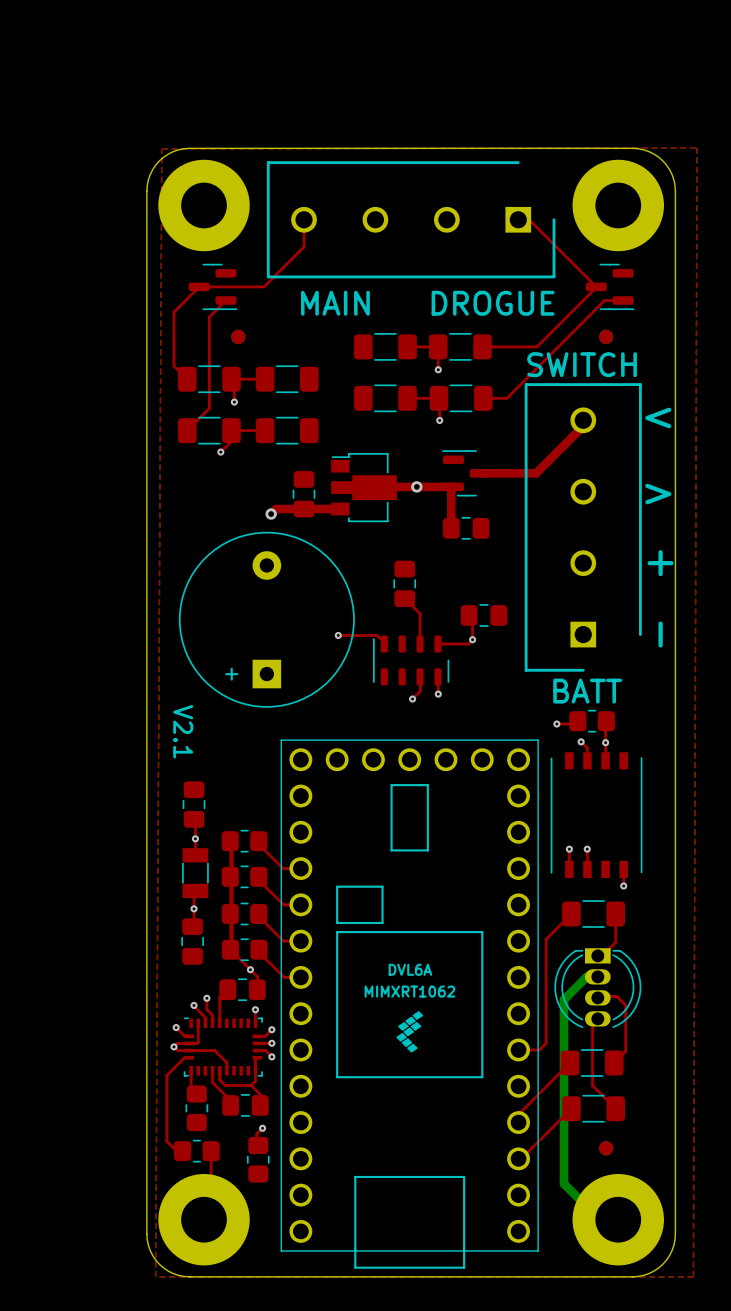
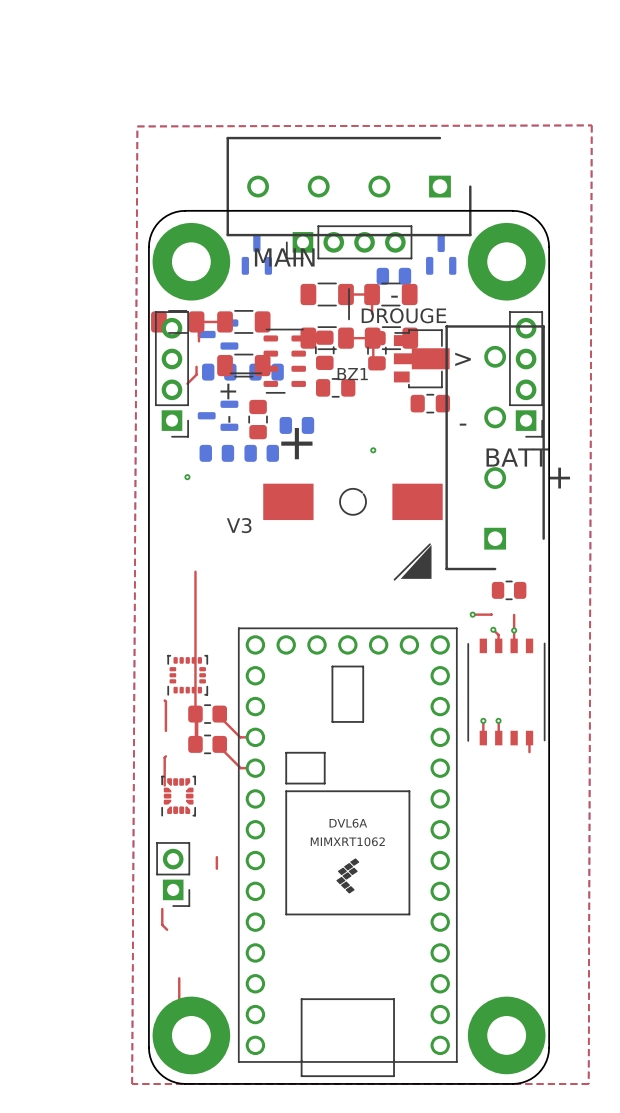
part position: (204, 205) -> (191, 261)
part position: (618, 205) -> (506, 261)
top track: (304, 219) (304, 246) (264, 286) (199, 286) (174, 312) (174, 366) (187, 379) -> none
top track: (518, 219) (529, 219) (596, 287) (536, 346) (482, 346) -> none
part: none -> (349, 242)
part side: top (213, 286) -> bottom (441, 254)
part side: top (610, 286) -> bottom (256, 254)
top track: (225, 300) (209, 317) (209, 408) (187, 430) -> none
top track: (623, 300) (604, 300) (506, 398) (483, 398) -> none
text: DROGUE (493, 303) -> none
part: none -> (393, 276)
part: (238, 336) -> none
part: (606, 336) -> none
line: none -> (349, 289) (349, 319)
text: none -> - (394, 296)
text: SWITCH (582, 364) -> none
via: (438, 369) -> none
text: none -> DROUGE (403, 315)
part: none -> (218, 334)
via: (234, 402) -> none
part: none -> (324, 350)
part: none -> (376, 350)
part footprint: [177, 416, 241, 445] -> [155, 311, 189, 438]
text: > (658, 417) -> none
via: (439, 420) -> none
top track: (582, 420) (582, 426) (536, 473) (480, 473) -> none
text: none -> > (463, 359)
top track: (231, 430) (265, 430) -> none
part: none -> (219, 372)
part: none -> (266, 372)
line: none -> (230, 373) (261, 373)
part: none -> (526, 374)
via: (220, 452) -> none
part: none -> (335, 387)
text: none -> + (228, 391)
part: (466, 473) -> none
part: none -> (430, 403)
via: (416, 486) -> none
top track: (341, 487) (453, 486) (451, 489) (451, 528) -> none
part position: (364, 487) -> (421, 358)
part: none -> (218, 415)
text: none -> - (229, 419)
text: > (658, 494) -> none
text: none -> - (463, 424)
part: none -> (296, 425)
top track: (340, 509) (276, 509) (271, 514) -> none
via: (271, 514) -> none
part: (466, 528) -> none
via: none -> (373, 450)
part: none -> (216, 453)
part: none -> (261, 453)
via: none -> (187, 477)
part: (404, 583) -> none
top track: (404, 598) (420, 613) (420, 644) -> none
top track: (469, 615) (472, 618) (472, 639) (468, 644) (437, 644) -> none
part: (483, 615) -> none
part: (266, 619) -> none
text: none -> V3 (239, 525)
BZ1: none -> (352, 532)
text: - (660, 634) -> none
top track: (338, 635) (377, 635) (384, 642) -> none
via: (338, 635) -> none
via: (472, 639) -> none
part rotation: 0° (411, 660) -> 90° clockwise (284, 361)
part position: (411, 660) -> (284, 361)
top track: none -> (195, 571) (195, 714)
top track: (420, 681) (420, 691) (412, 699) -> none
top track: (438, 681) (438, 694) -> none
text position: BATT (587, 691) -> BATT (517, 457)
via: (438, 694) -> none
part: none -> (509, 590)
via: (412, 699) -> none
part: (592, 721) -> none
text: V2.1 (183, 731) -> none
part: none -> (187, 675)
part: (194, 804) -> none
via: (195, 838) -> none
part: (195, 873) -> none
top track: (231, 878) (231, 950) -> none
via: (623, 886) -> none
via: (194, 908) -> none
part: (244, 914) -> none
top track: (571, 914) (546, 939) (546, 1043) (539, 1049) (518, 1049) -> none
part: (593, 914) -> none
top track: (615, 914) (615, 942) (597, 960) -> none
top track: (257, 915) (283, 941) (300, 941) -> none
part: none -> (178, 796)
part: (192, 941) -> none
part: (244, 949) -> none
top track: (231, 950) (257, 976) (257, 989) -> none
top track: (257, 950) (284, 977) (300, 977) -> none
via: (250, 969) -> none
bottom track: (597, 976) (586, 976) (563, 999) (563, 1183) (602, 1222) -> none
part: (597, 988) -> none
top track: (230, 989) (227, 989) (219, 997) (219, 1023) -> none
part: (242, 989) -> none
top track: (597, 996) (616, 996) (625, 1005) (625, 1051) (614, 1063) -> none
top track: (206, 998) (206, 1009) (212, 1015) (212, 1023) -> none
via: (206, 998) -> none
top track: (194, 1005) (205, 1017) (205, 1023) -> none
via: (194, 1005) -> none
via: (255, 1009) -> none
top track: (597, 1018) (592, 1024) (592, 1085) (615, 1108) -> none
top track: (198, 1023) (198, 1042) (189, 1043) -> none
top track: (176, 1027) (184, 1036) (189, 1036) -> none
via: (176, 1027) -> none
top track: (271, 1029) (265, 1036) (257, 1036) -> none
via: (271, 1029) -> none
part: none -> (173, 874)
top track: (192, 1043) (177, 1043) (174, 1046) (177, 1050) (214, 1050) (226, 1062) (226, 1070) -> none
top track: (257, 1043) (271, 1043) -> none
via: (271, 1043) -> none
via: (174, 1046) -> none
part: (223, 1047) -> none
top track: (257, 1050) (265, 1050) (271, 1056) -> none
via: (271, 1056) -> none
top track: (189, 1057) (184, 1057) (166, 1075) (166, 1141) (178, 1152) -> none
top track: (257, 1057) (255, 1059) (255, 1081) (251, 1085) -> none
top track: (569, 1063) (518, 1114) -> none
part: (592, 1063) -> none
top track: (212, 1070) (212, 1082) (226, 1096) (230, 1096) -> none
top track: (219, 1070) (219, 1079) (225, 1085) (251, 1085) -> none
top track: (251, 1085) (260, 1094) (260, 1099) -> none
part: (245, 1105) -> none
part: (196, 1108) -> none
top track: (571, 1108) (521, 1158) -> none
part: (593, 1108) -> none
top track: (262, 1128) (256, 1134) (256, 1141) -> none
via: (262, 1128) -> none
part: (606, 1148) -> none
part: (196, 1151) -> none
part: (258, 1159) -> none
part position: (204, 1219) -> (191, 1035)
part position: (618, 1219) -> (506, 1035)
board edge: (218, 1276) (184, 1276) (168, 1271) (152, 1255) (146, 1233) (146, 191) (150, 174) (159, 160) (173, 151) (189, 148) (632, 148) (653, 154) (666, 165) (672, 174) (675, 191) (675, 1233) (669, 1255) (653, 1271) (638, 1276) (603, 1276) -> (185, 1083) (171, 1081) (159, 1073) (151, 1061) (148, 1047) (148, 247) (151, 233) (159, 221) (171, 213) (185, 210) (512, 210) (530, 215) (541, 225) (546, 233) (549, 247) (549, 1047) (546, 1061) (538, 1073) (526, 1081) (512, 1083)

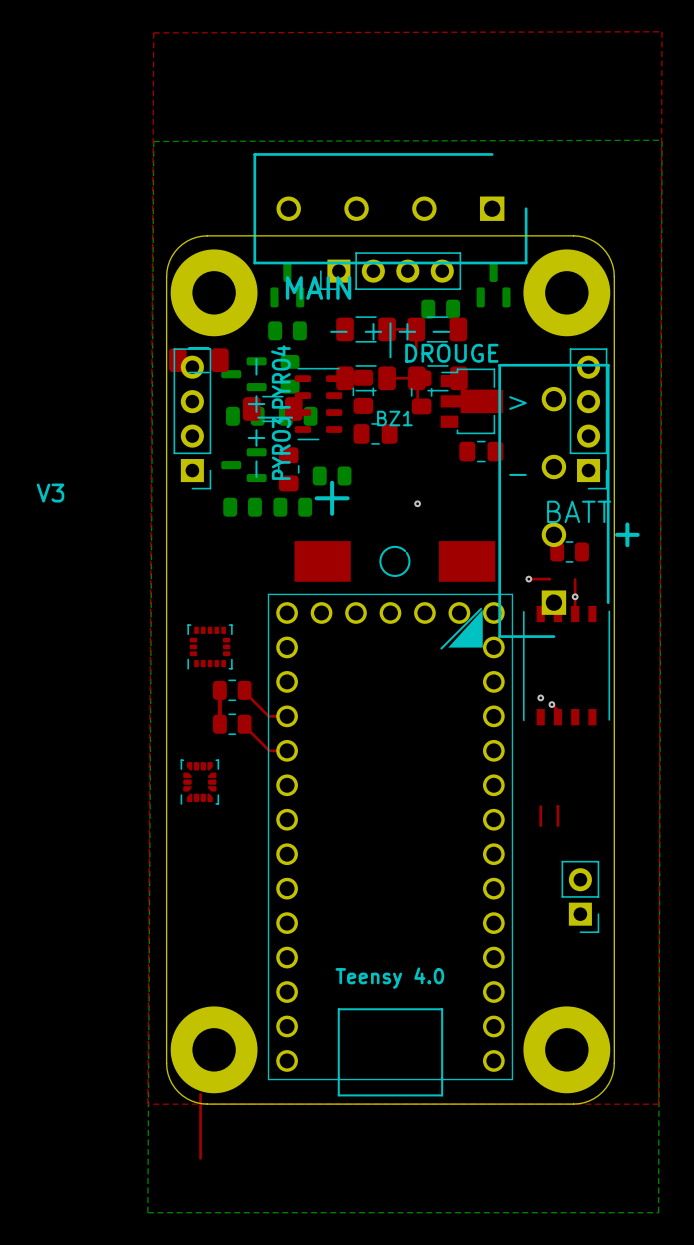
top zone outline: (591, 125) (137, 126) (132, 1084) (588, 1084) (591, 125) -> (661, 31) (153, 32) (147, 1104) (658, 1104) (661, 31)
part: none -> (287, 330)
text: none -> + (373, 331)
text: none -> + (407, 331)
text: none -> - (338, 331)
top track: (225, 321) (195, 321) (198, 325) (198, 341) -> none
part: (243, 321) -> none
text: none -> - (256, 366)
part: none -> (290, 374)
text: none -> PYRO4 (280, 376)
text: none -> + (256, 404)
top track: (196, 366) (196, 374) (187, 383) -> none
text: none -> PYRO3 (281, 448)
via: (187, 477) -> none
part: none -> (569, 551)
via: none -> (528, 579)
text position: V3 (239, 525) -> V3 (50, 493)
via: none -> (575, 596)
top track: (195, 571) (195, 714) -> none
part footprint: [491, 580, 527, 601] -> [523, 605, 611, 726]
top track: (472, 614) (491, 614) -> (528, 579) (549, 579)
via position: (472, 614) -> (540, 697)
top track: (514, 614) (514, 645) -> (575, 579) (575, 614)
part: none -> (232, 690)
via: (514, 630) -> none
part: none -> (232, 724)
part position: (187, 675) -> (210, 646)
part: (506, 691) -> none
top track: (164, 700) (165, 730) -> none
part: (207, 714) -> none
top track: (196, 715) (196, 746) -> (219, 692) (219, 726)
top track: (218, 715) (240, 737) (255, 737) -> (244, 692) (268, 716) (285, 716)
via: (483, 720) -> none
via: (498, 720) -> none
top track: (529, 738) (529, 752) -> none
part: (207, 744) -> none
top track: (218, 746) (240, 768) (255, 768) -> (244, 726) (269, 750) (285, 750)
part: none -> (390, 845)
top track: (165, 756) (164, 785) -> none
part position: (178, 796) -> (199, 782)
part: none -> (580, 896)
part: (347, 852) -> none
top track: (216, 857) (216, 868) -> none
part: (173, 874) -> none
top track: (162, 909) (162, 924) (167, 929) -> none
board edge: (148, 950) (150, 1056) (156, 1069) (163, 1076) (175, 1082) (185, 1083) (512, 1083) (526, 1081) (541, 1069) (548, 1052) (549, 950) -> (166, 1063) (169, 1078) (178, 1092) (191, 1101) (207, 1104) (578, 1103) (593, 1098) (605, 1088) (612, 1073) (614, 1063)
part position: (191, 1035) -> (214, 1049)
part position: (506, 1035) -> (566, 1049)

